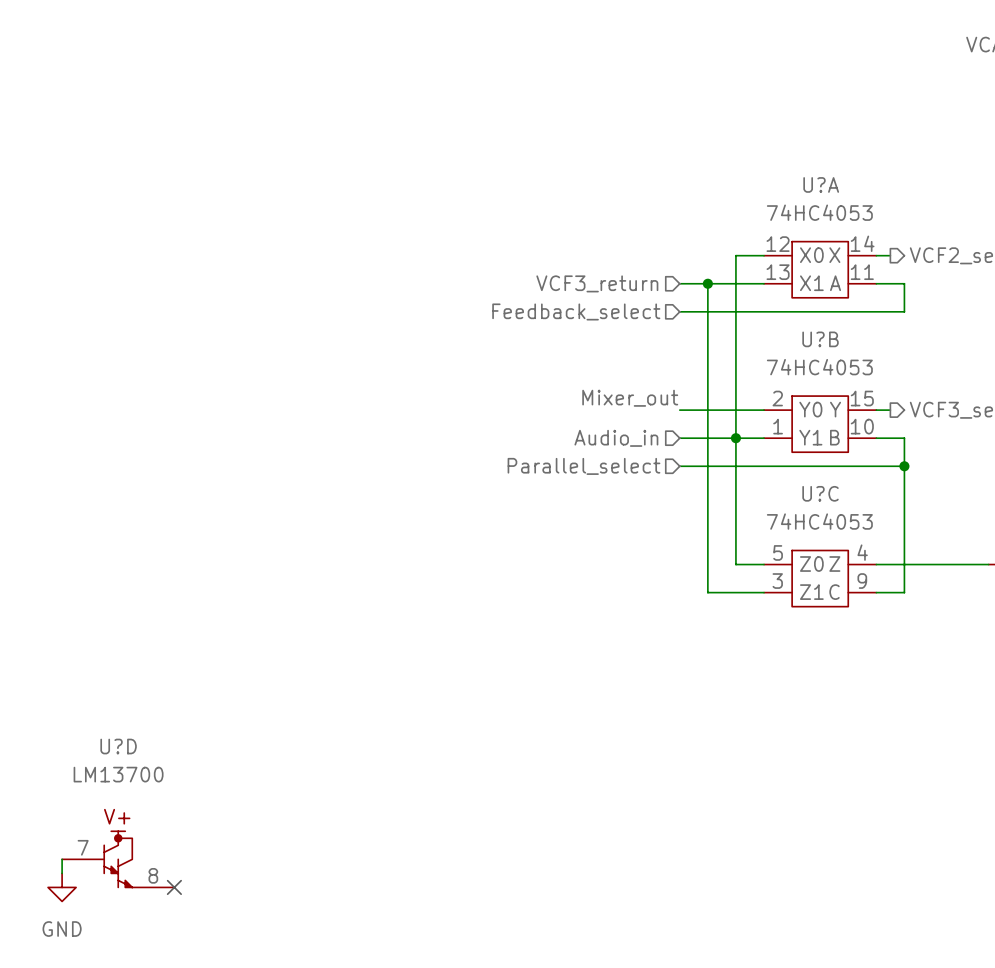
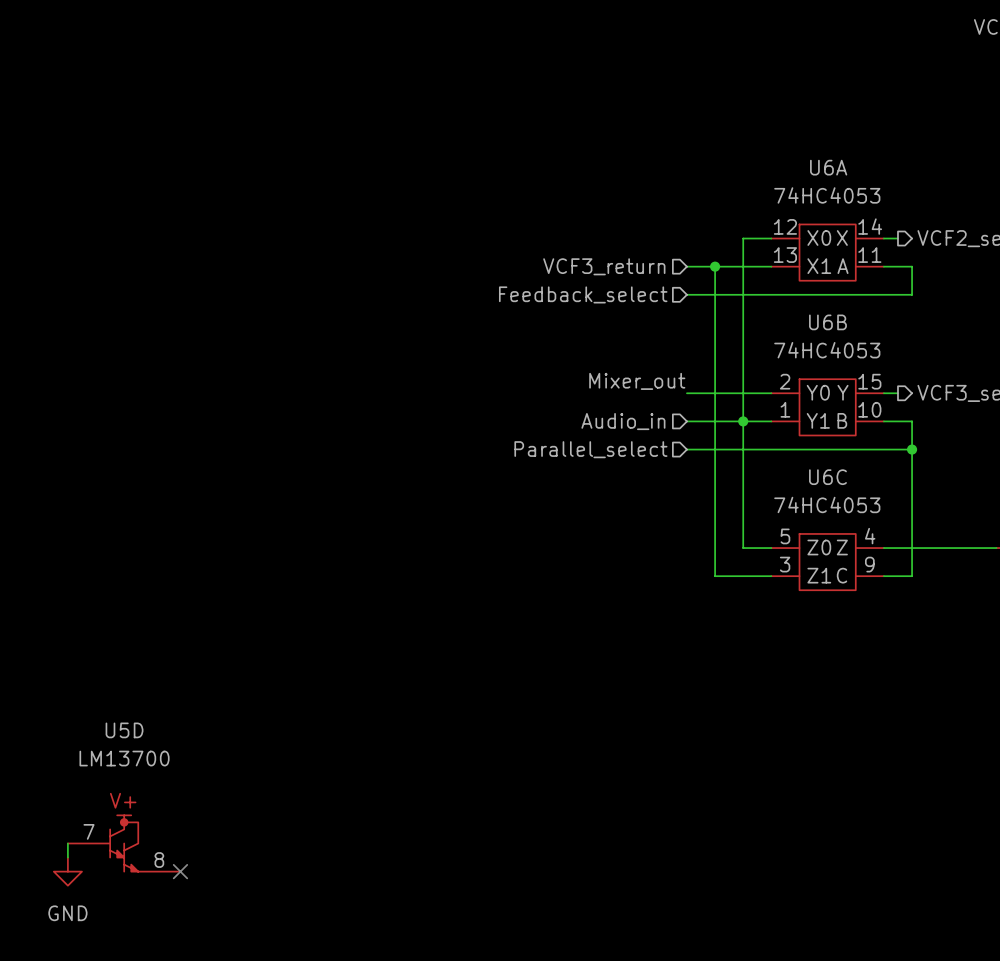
U?A name: U?A (821, 184) -> U6A (828, 167)
U?B name: U?B (820, 339) -> U6B (827, 322)
U?C name: U?C (820, 493) -> U6C (827, 477)
U?D name: U?D (118, 746) -> U5D (124, 730)

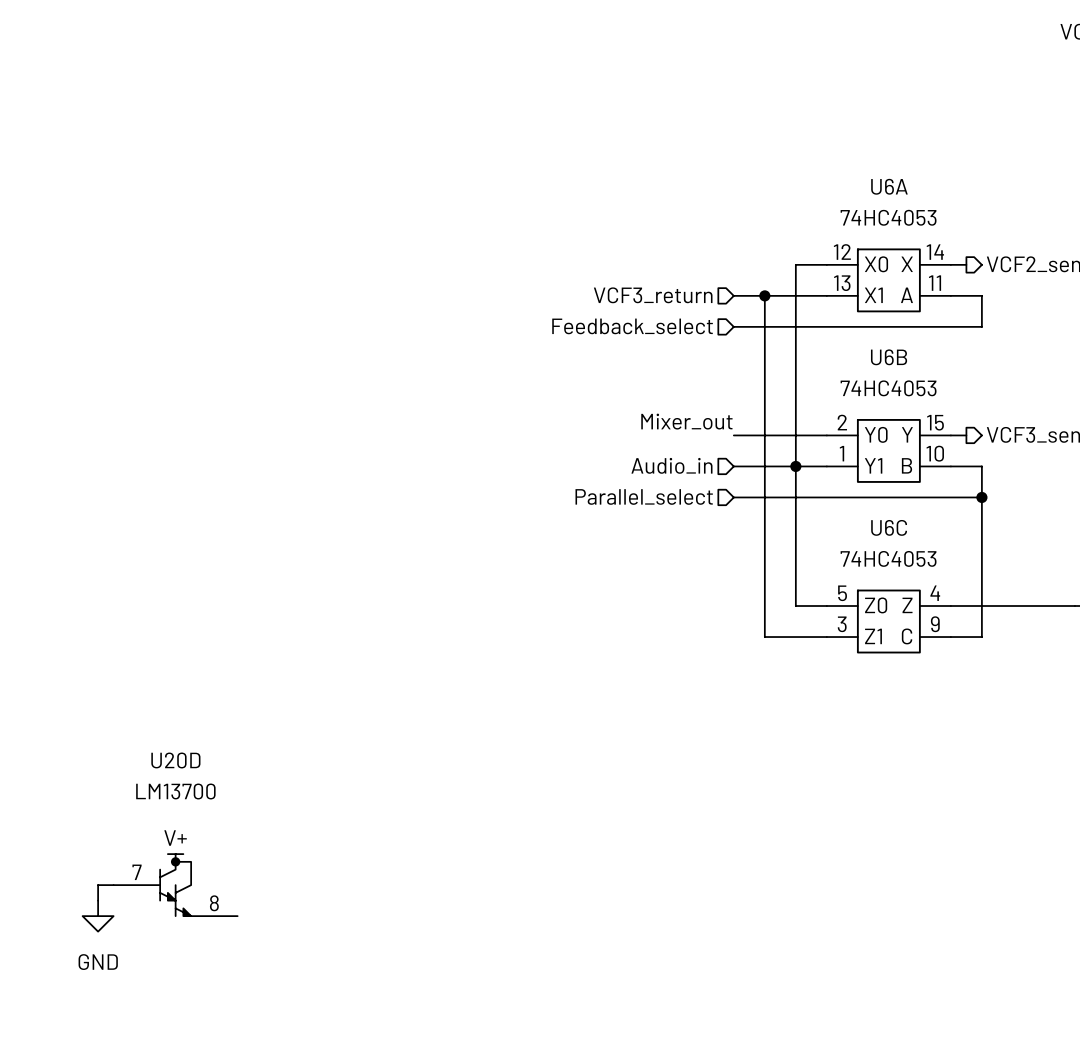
wire: none -> (113, 885) (98, 885) (98, 900)
U20D: none -> LM13700 (175, 885)
wire: (67, 843) (67, 857) -> none
U5D: LM13700 (124, 843) -> none
power symbol position: GND (67, 871) -> GND (98, 916)
no-connect mark: (180, 871) -> none

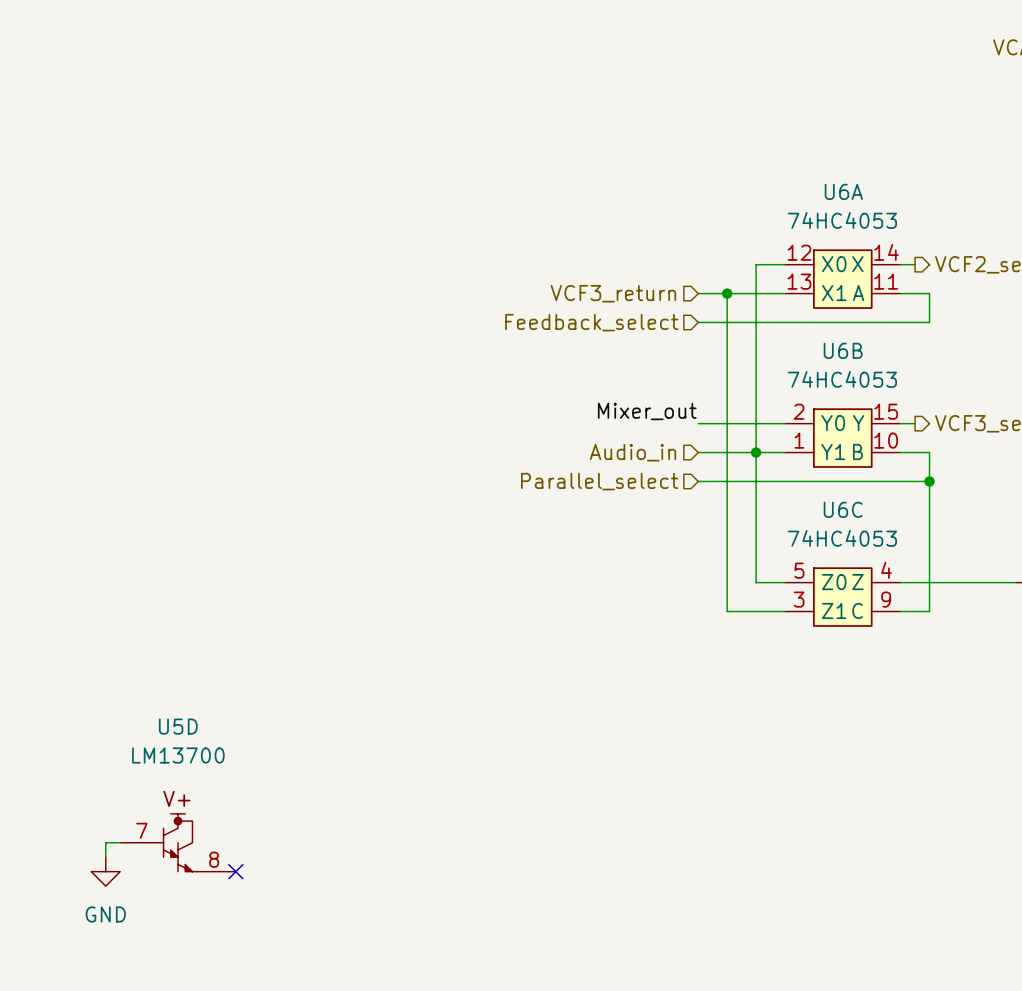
U20D name: U20D (175, 760) -> U5D (178, 726)
no-connect mark: none -> (235, 871)

